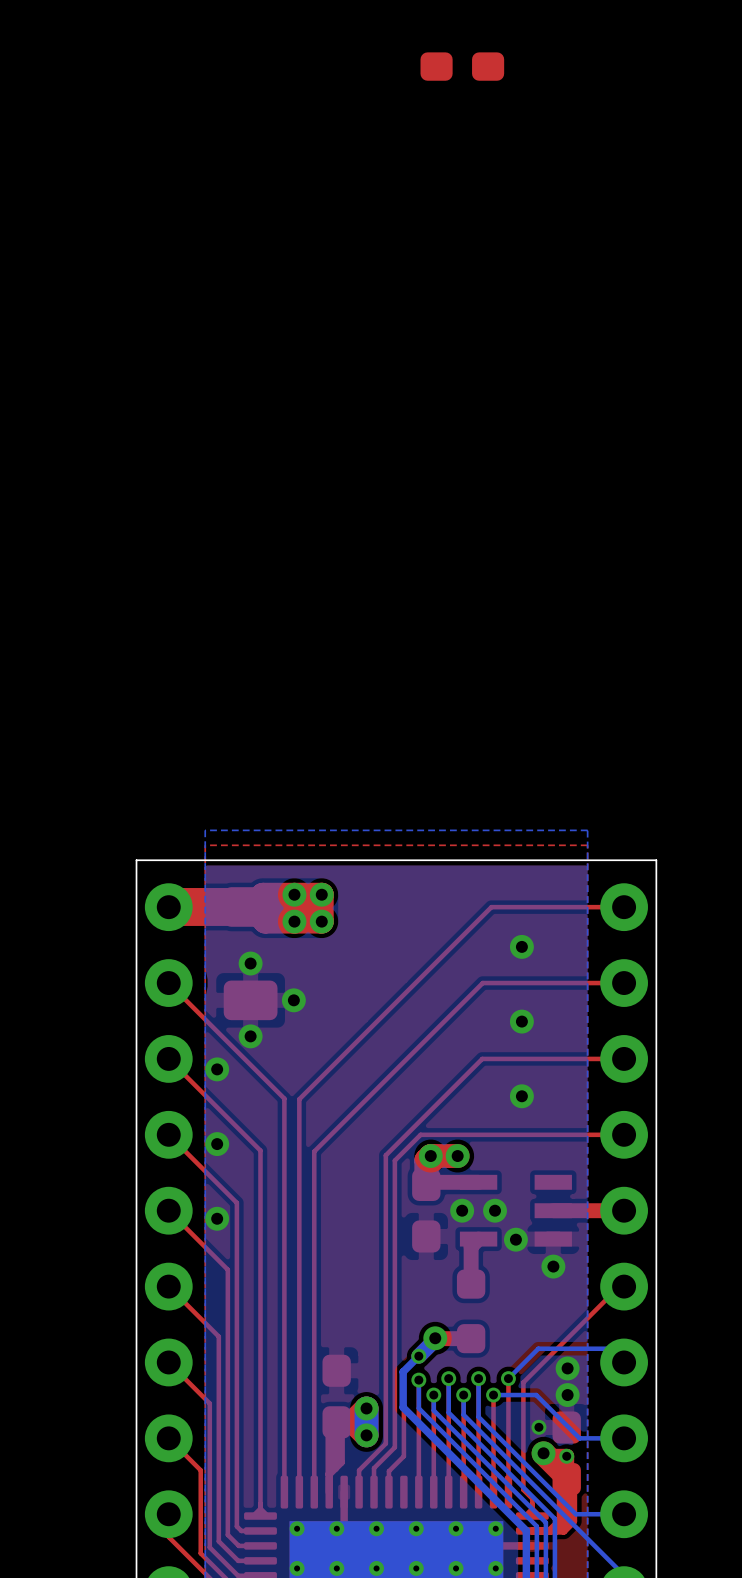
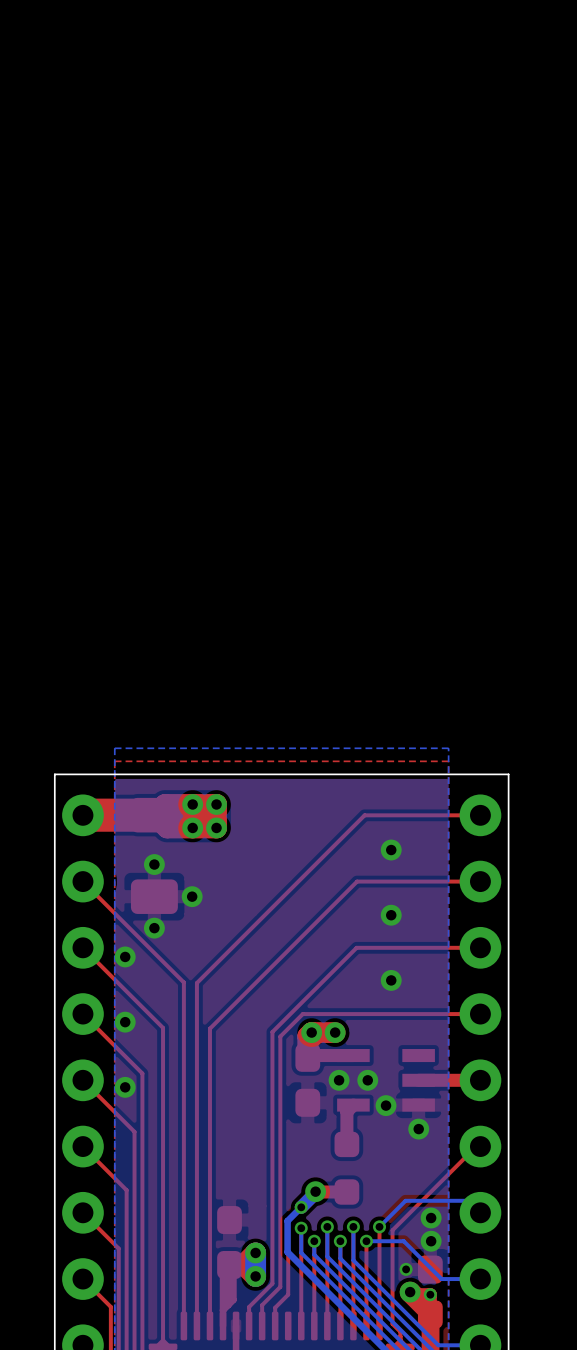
part: (462, 66) -> none

